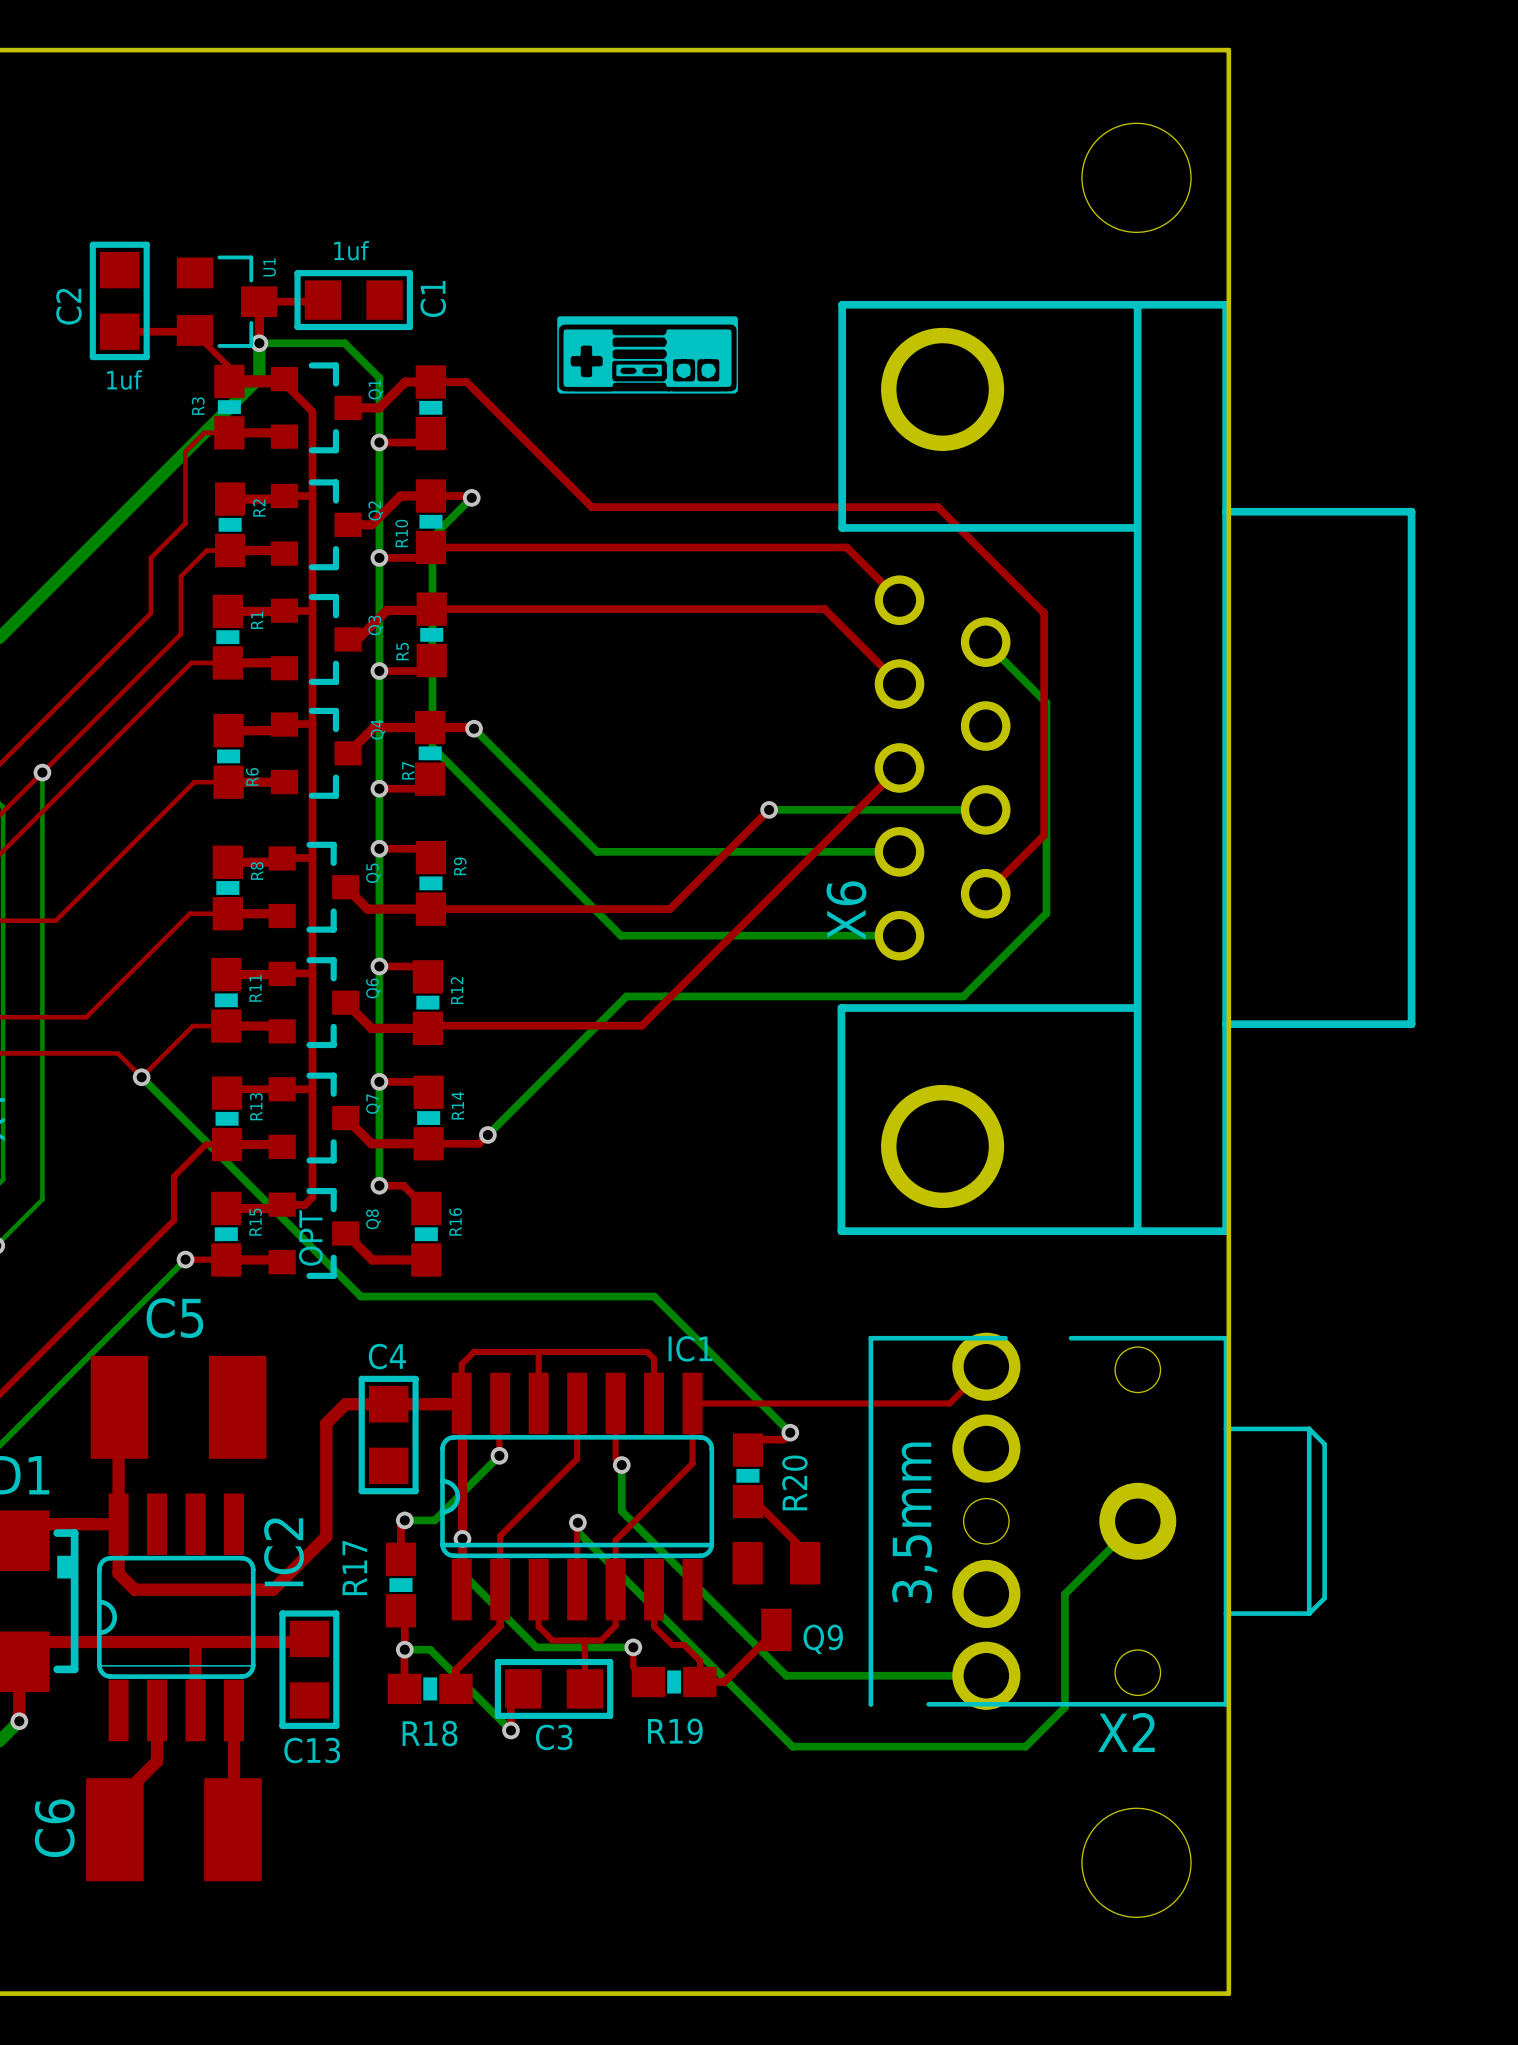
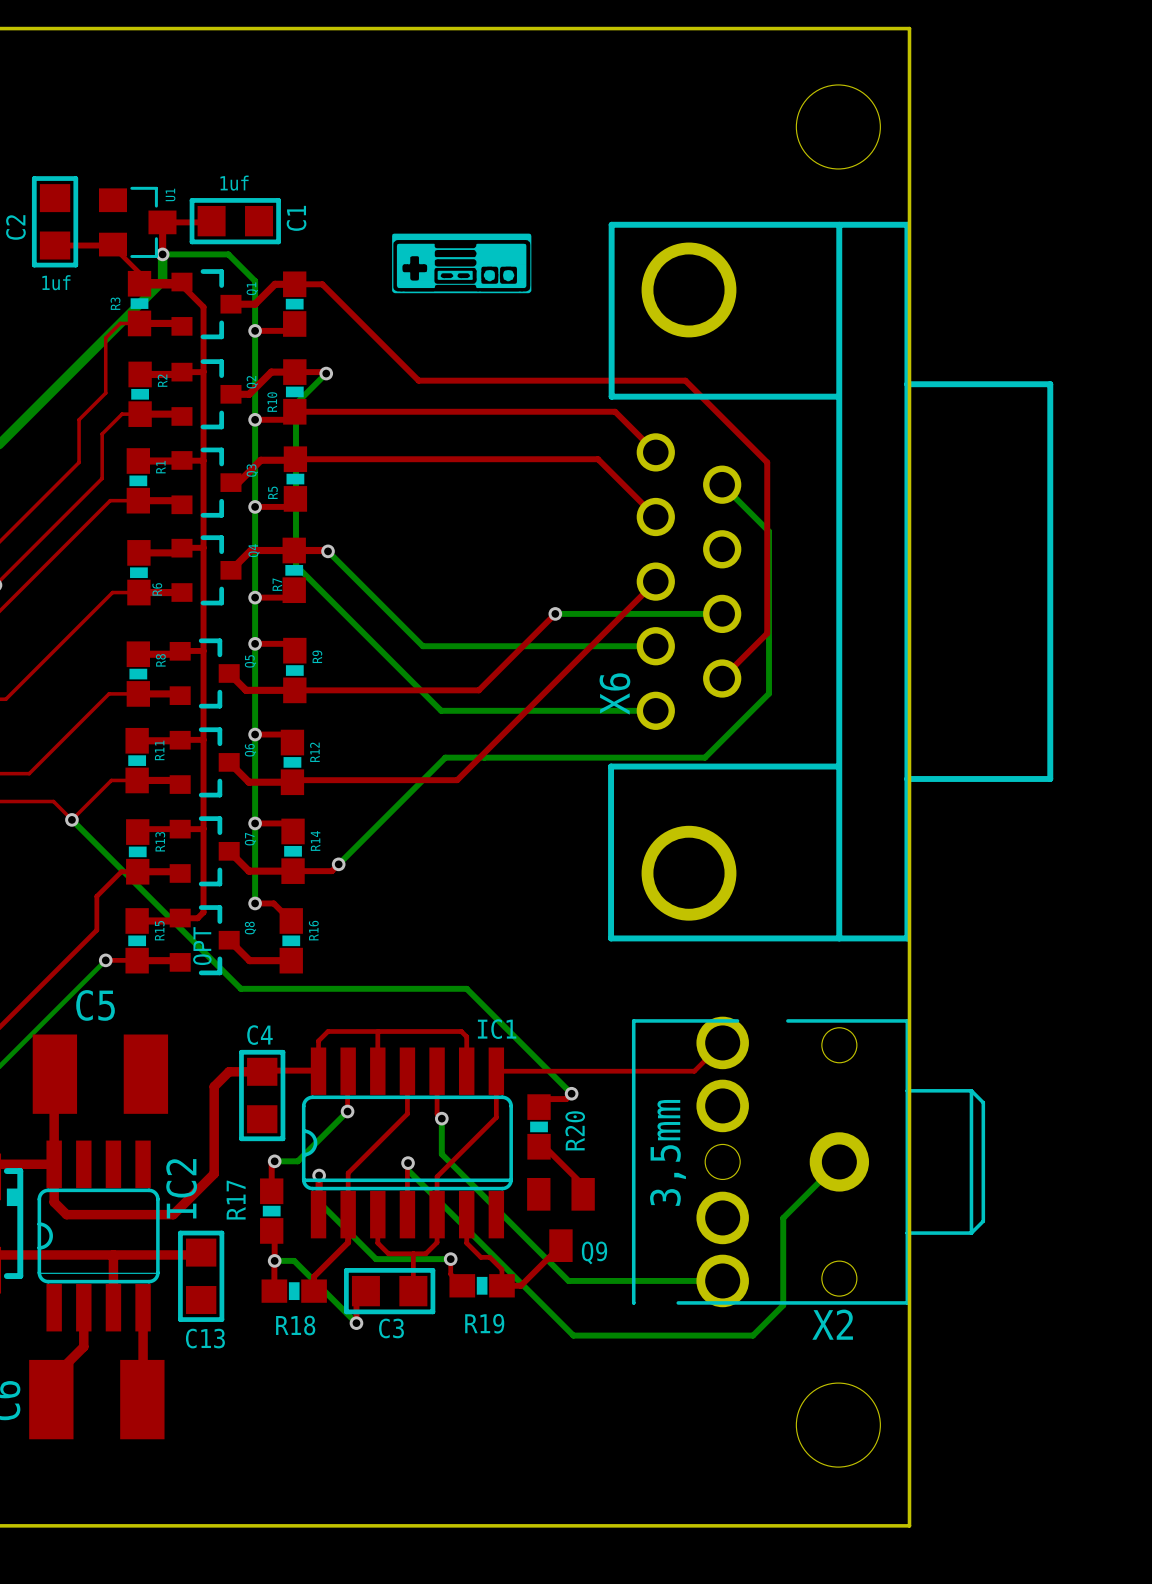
top track: (389, 1403) (462, 1404) (462, 1538) -> (263, 1070) (318, 1070)

